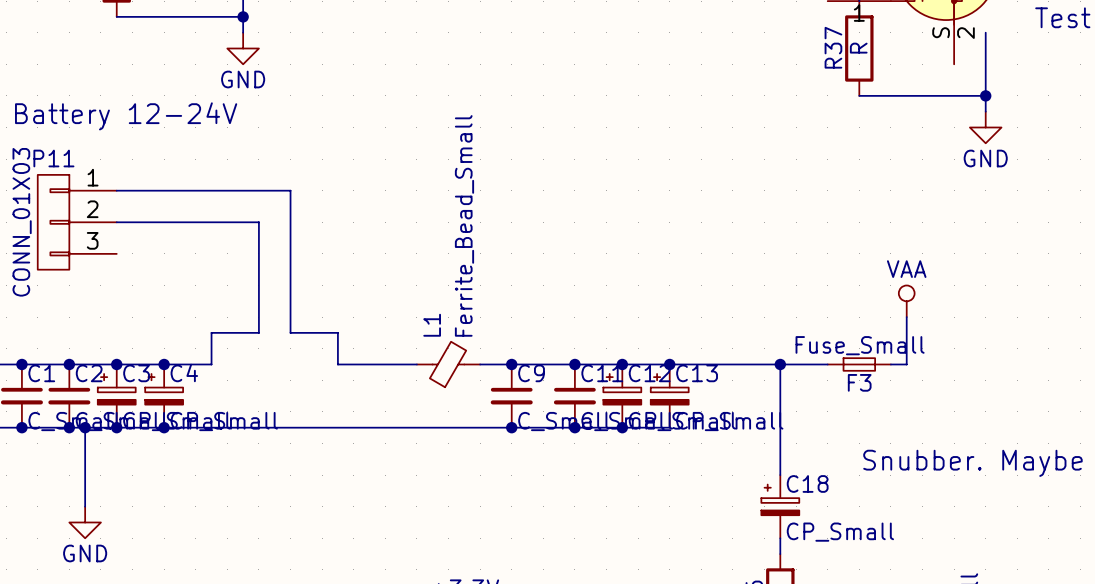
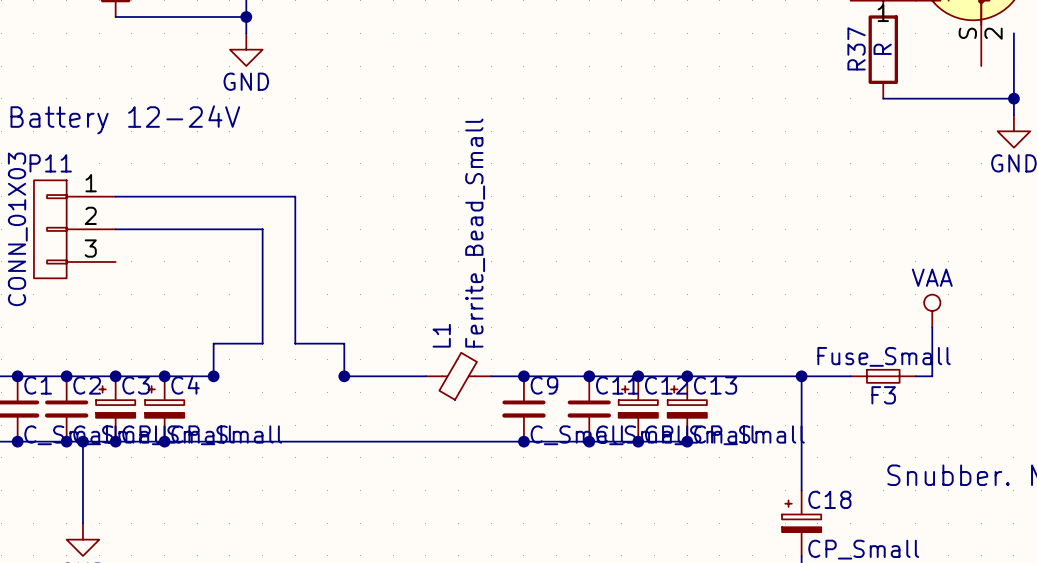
junction: none -> (213, 376)
junction: none -> (344, 376)
junction: none -> (687, 441)

